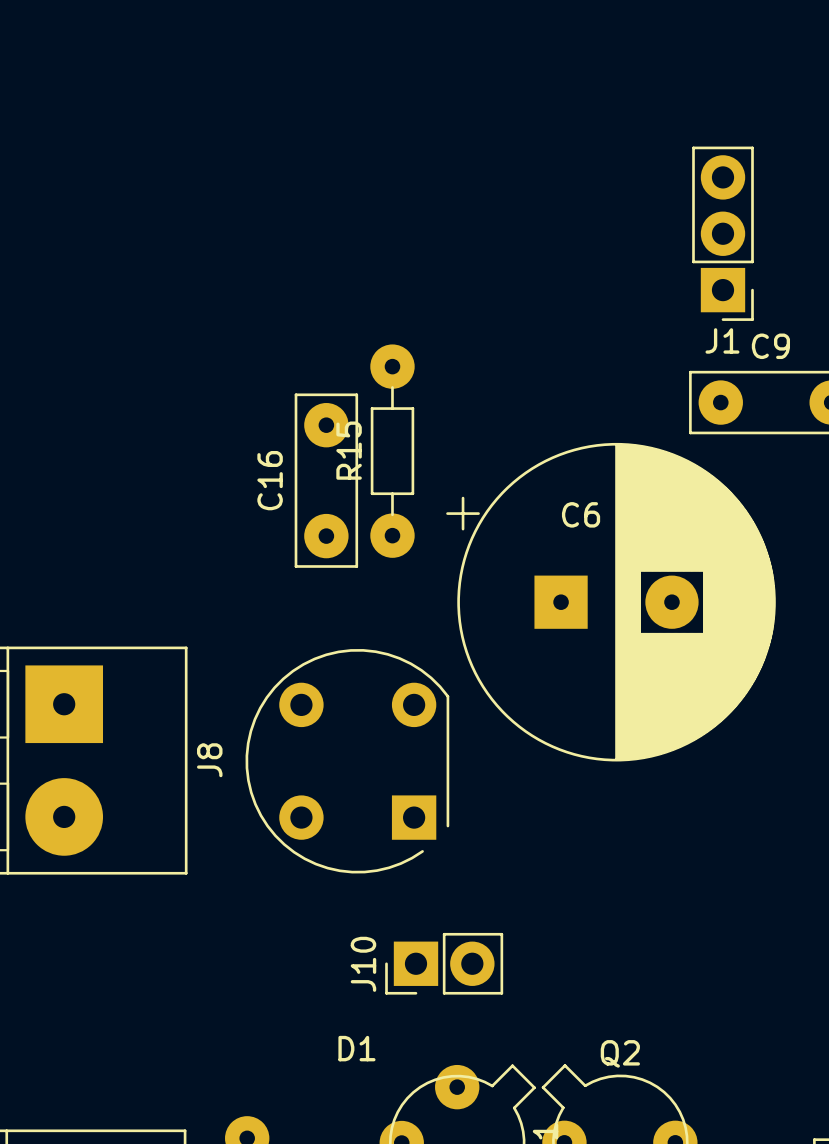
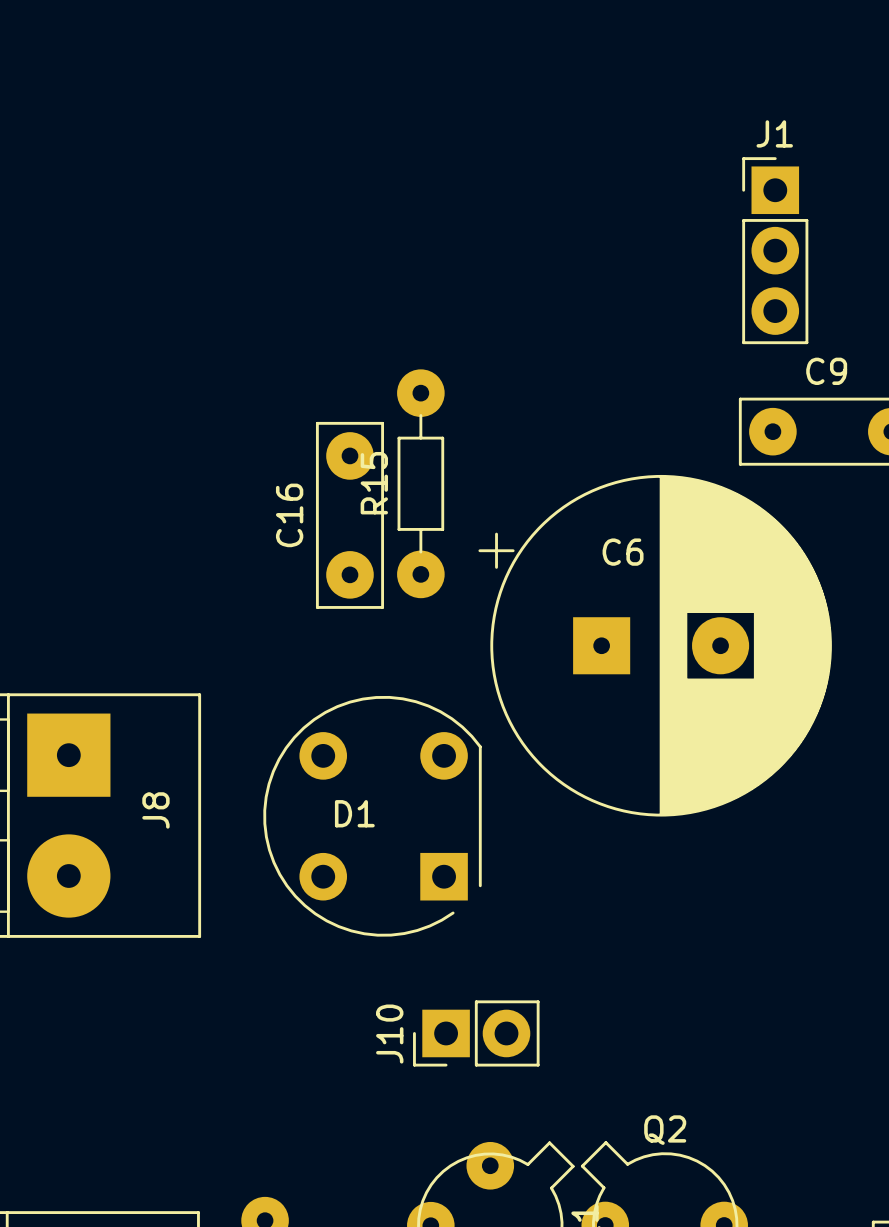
J1 rotation: 0° (723, 233) -> 180° (775, 250)
J8 name position: J8 (209, 760) -> J8 (155, 810)
D1 name position: D1 (356, 1048) -> D1 (354, 813)

